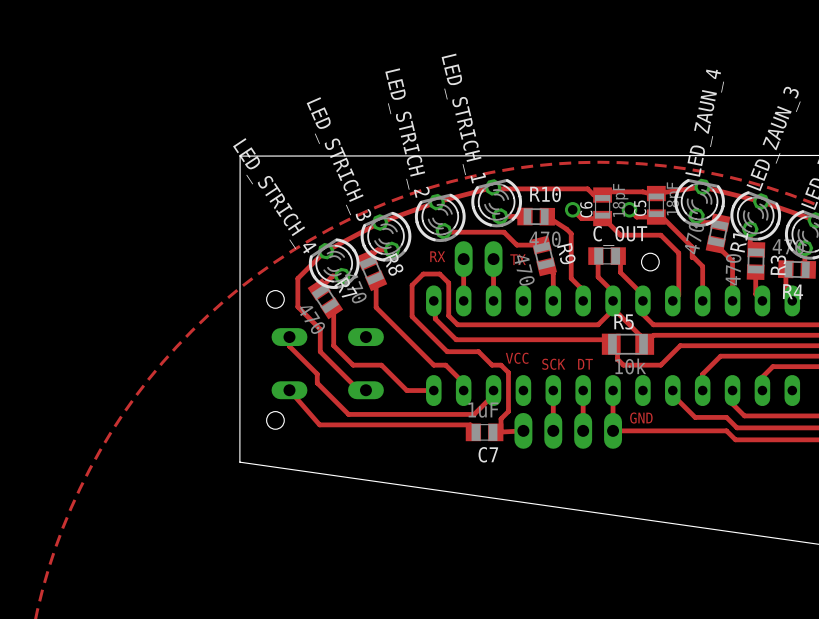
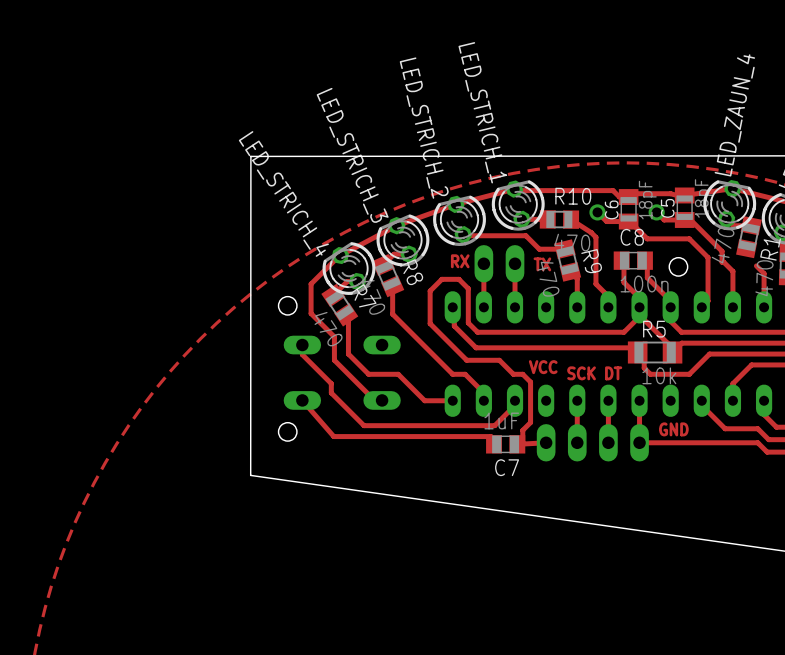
C_OUT name: C_OUT (620, 235) -> C8 (632, 237)
top track: (715, 244) (732, 261) (732, 268) -> (756, 265) (764, 273)
C_OUT value: none -> 100n (644, 284)

